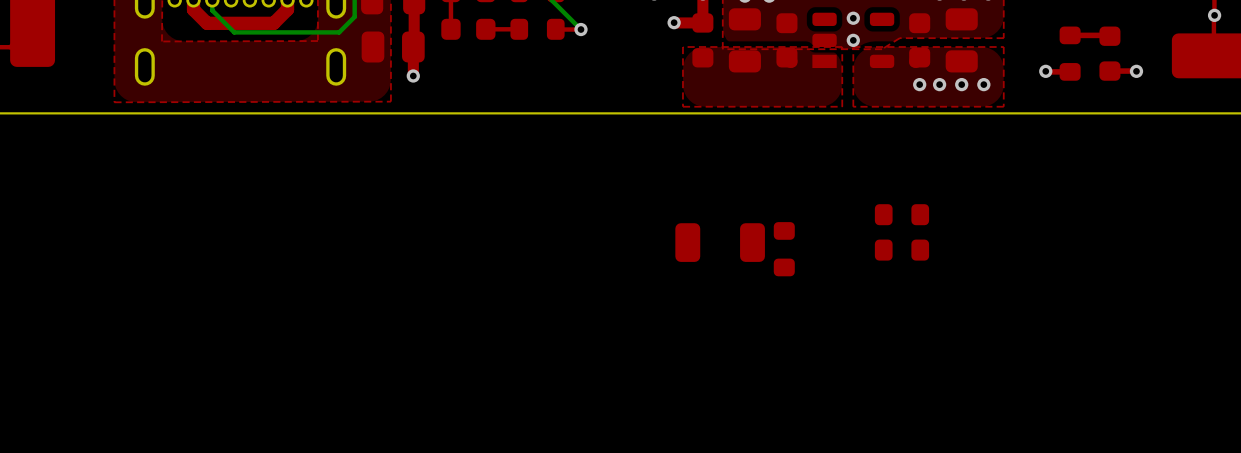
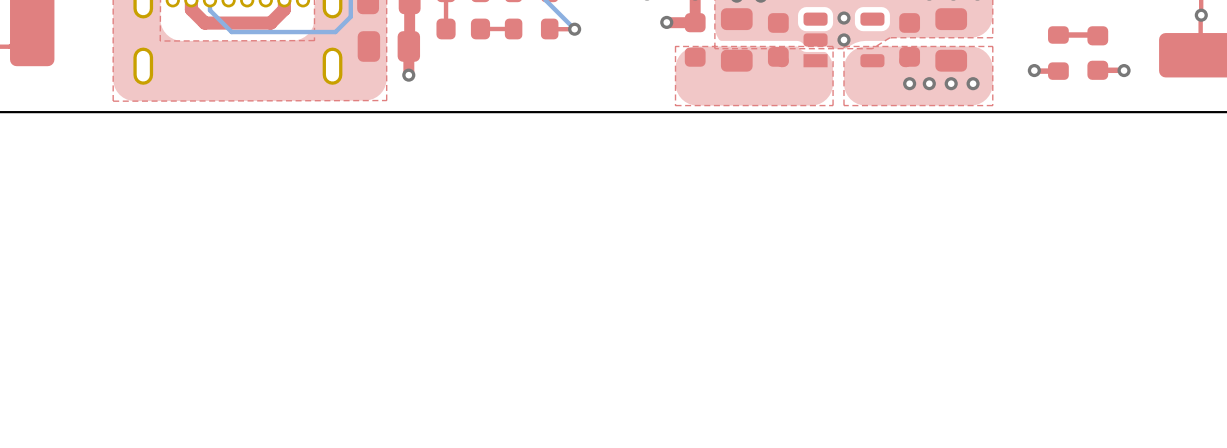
part: (901, 214) -> none
part: (720, 242) -> none
part: (784, 249) -> none
part: (901, 250) -> none

